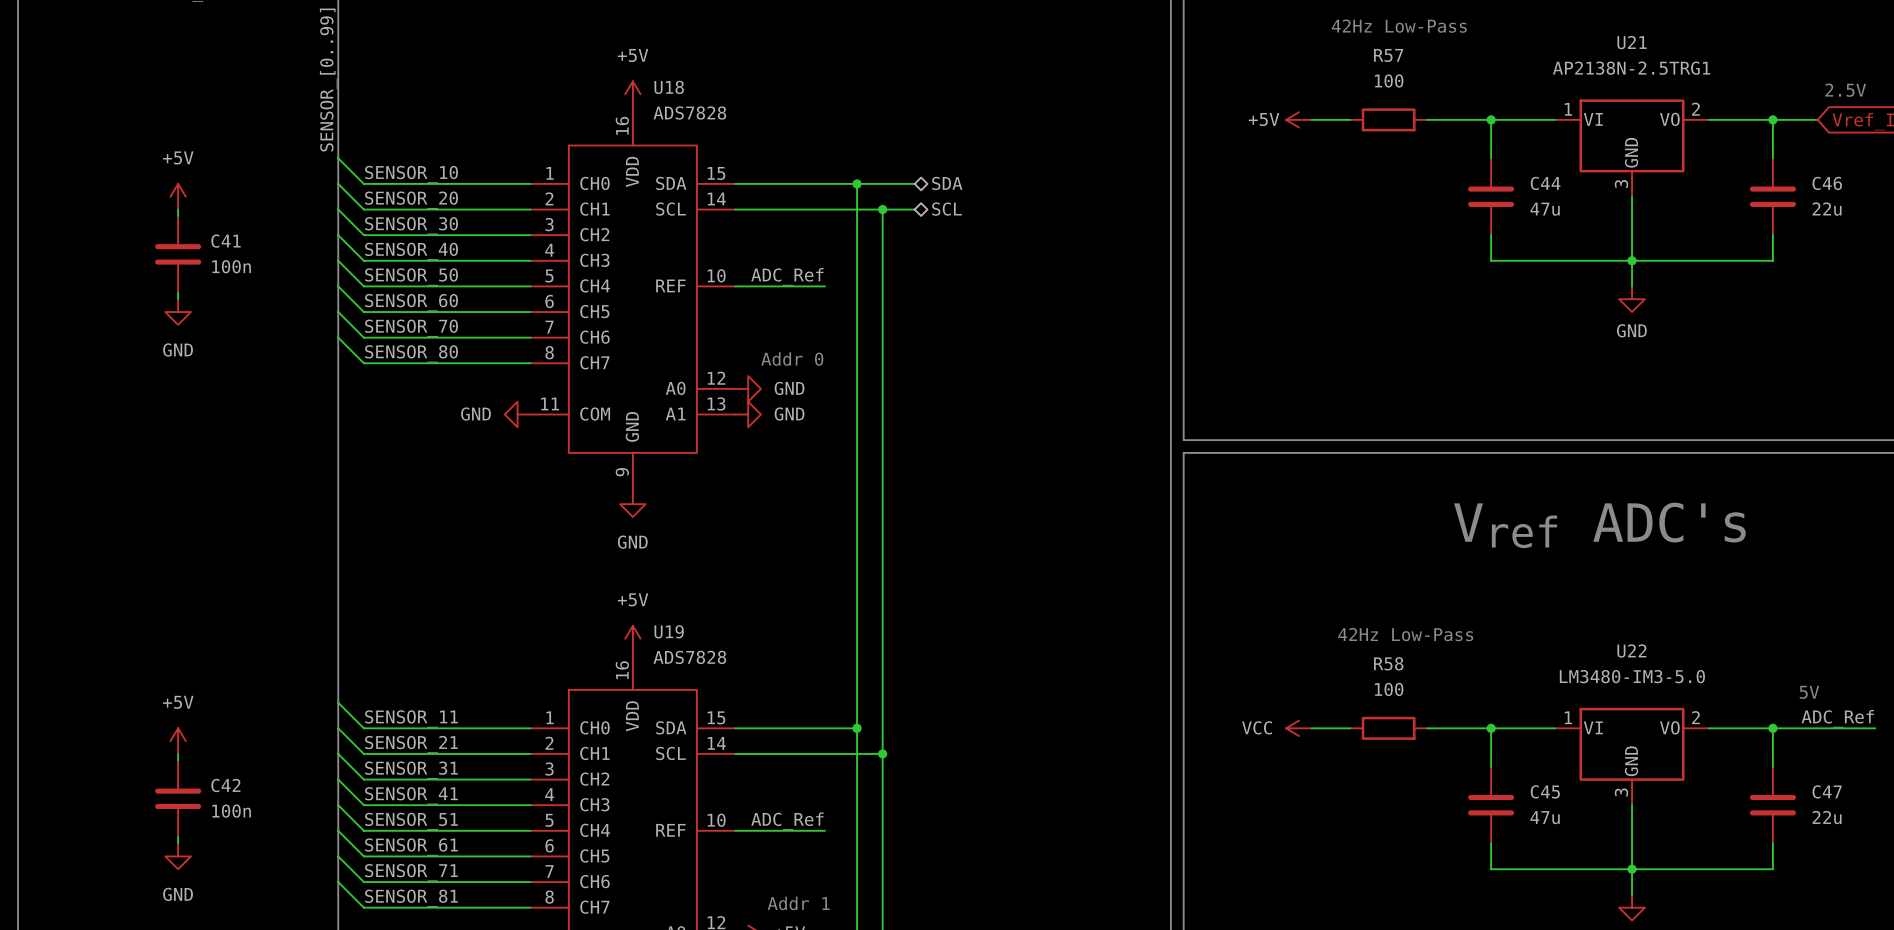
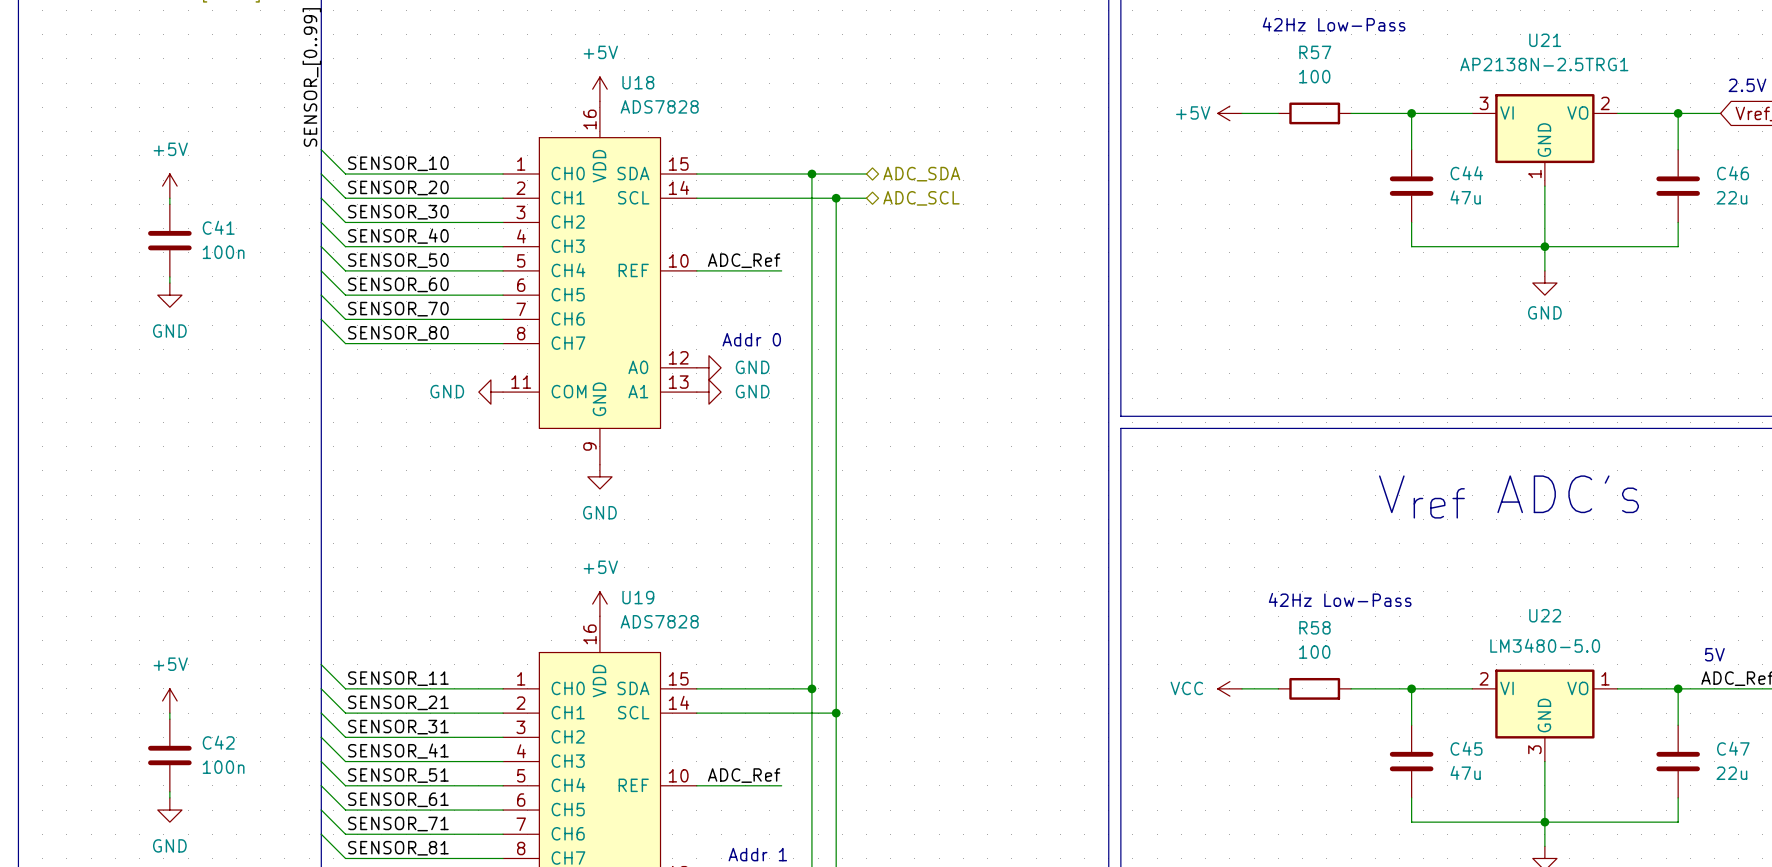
U21 pin number: 1 (1568, 109) -> 3 (1484, 103)
hierarchical label: SDA (947, 183) -> ADC_SDA (921, 174)
U21 pin number: 3 (1621, 184) -> 1 (1534, 174)
hierarchical label: SCL (947, 209) -> ADC_SCL (921, 198)
U22 value: LM3480-IM3-5.0 (1632, 676) -> LM3480-5.0 (1545, 645)
U22 pin number: 1 (1568, 717) -> 2 (1484, 678)
U22 pin number: 2 (1695, 717) -> 1 (1605, 678)

